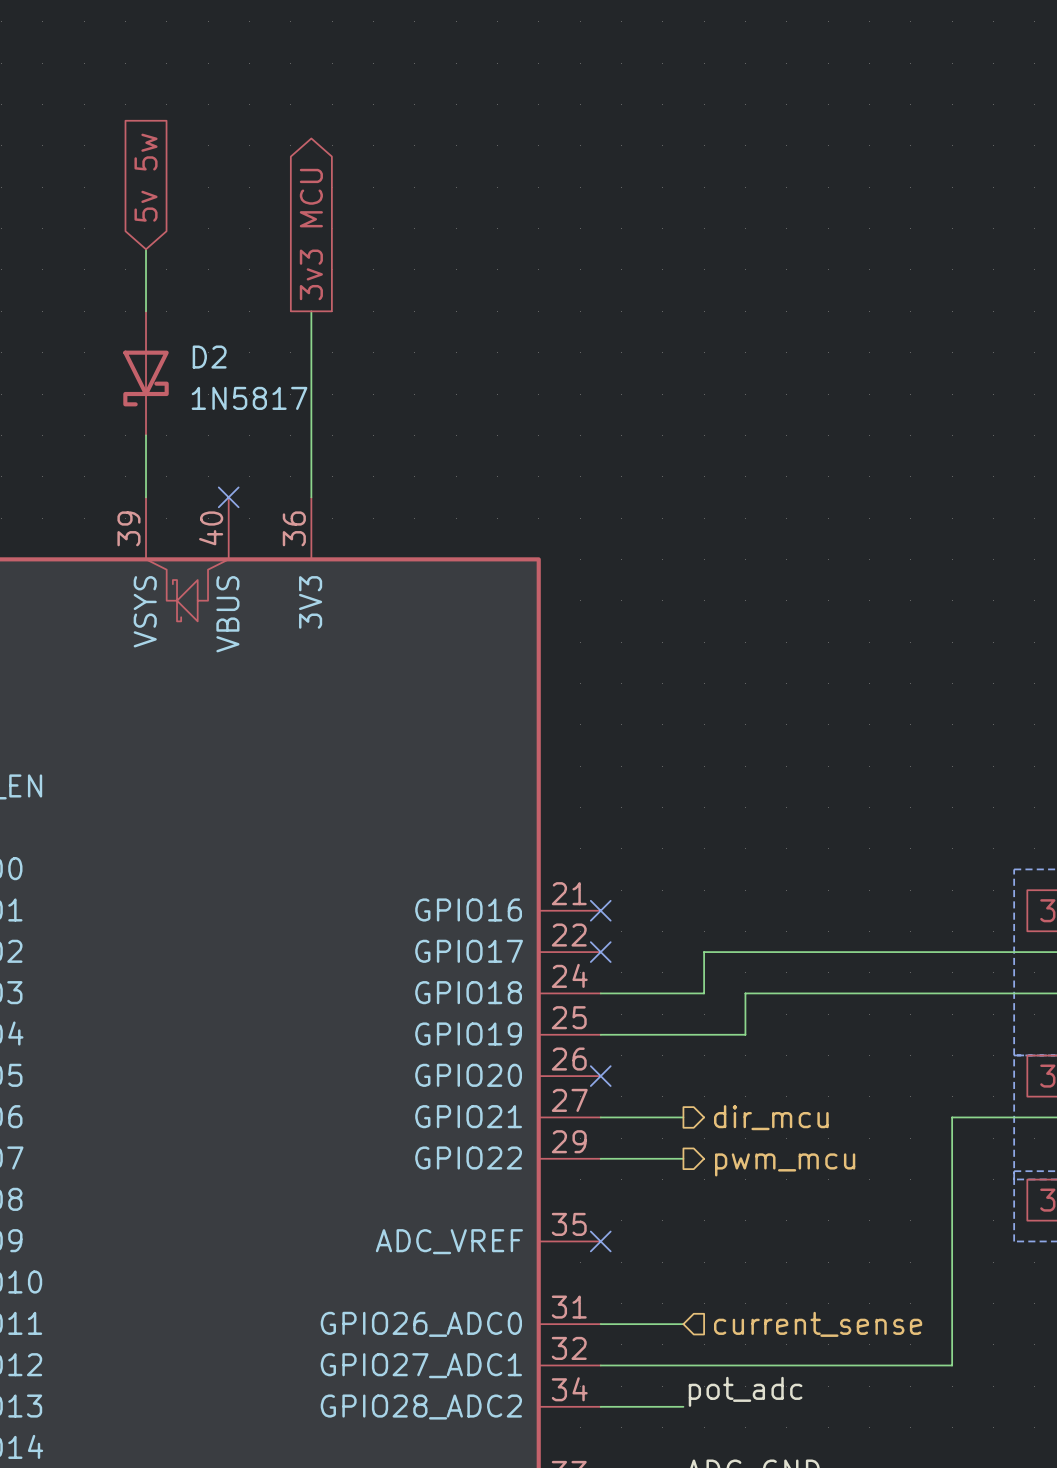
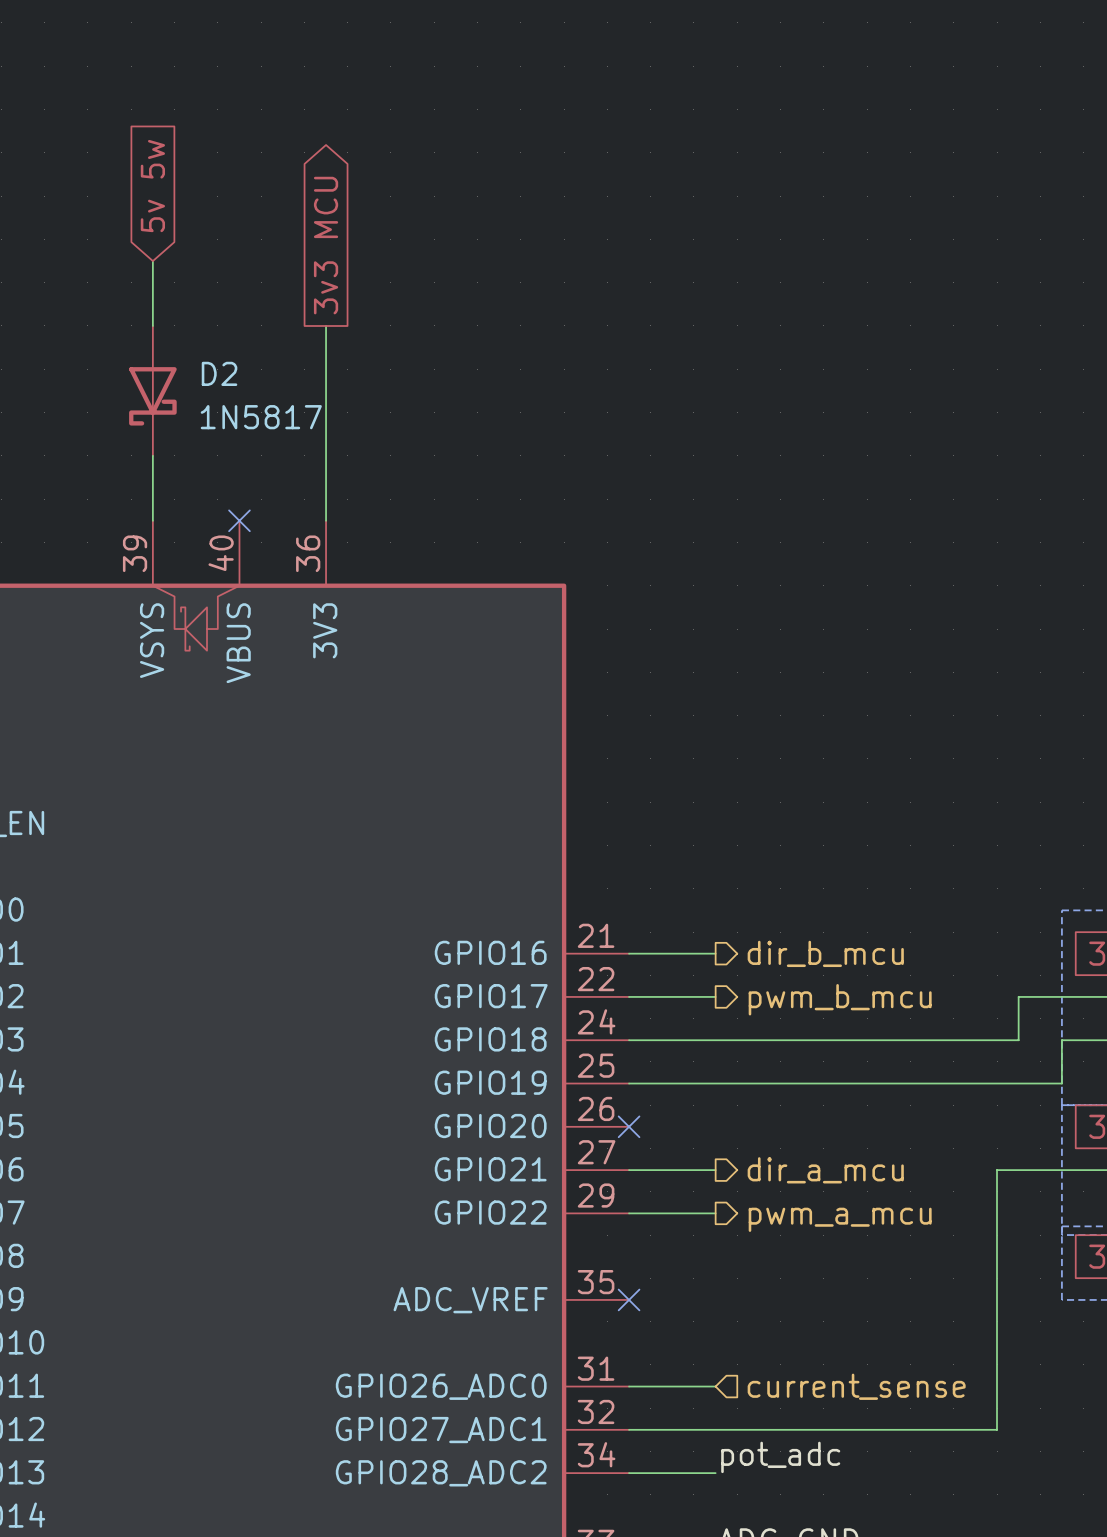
wire: none -> (629, 953) (715, 953)
no-connect mark: (600, 910) -> none
hierarchical label: none -> dir_b_mcu (825, 953)
wire: none -> (629, 996) (715, 996)
no-connect mark: (600, 952) -> none
wire: (972, 952) (704, 952) (704, 993) -> none
hierarchical label: none -> pwm_b_mcu (840, 999)
wire: (745, 993) (745, 1034) -> (780, 1040) (737, 1040)
wire: (972, 993) (1014, 993) -> (1018, 1040) (1018, 996)
wire: none -> (1061, 1040) (1061, 1083) (780, 1083)
hierarchical label: dir_mcu (771, 1117) -> dir_a_mcu (825, 1170)
hierarchical label: pwm_mcu (785, 1164) -> pwm_a_mcu (840, 1219)

